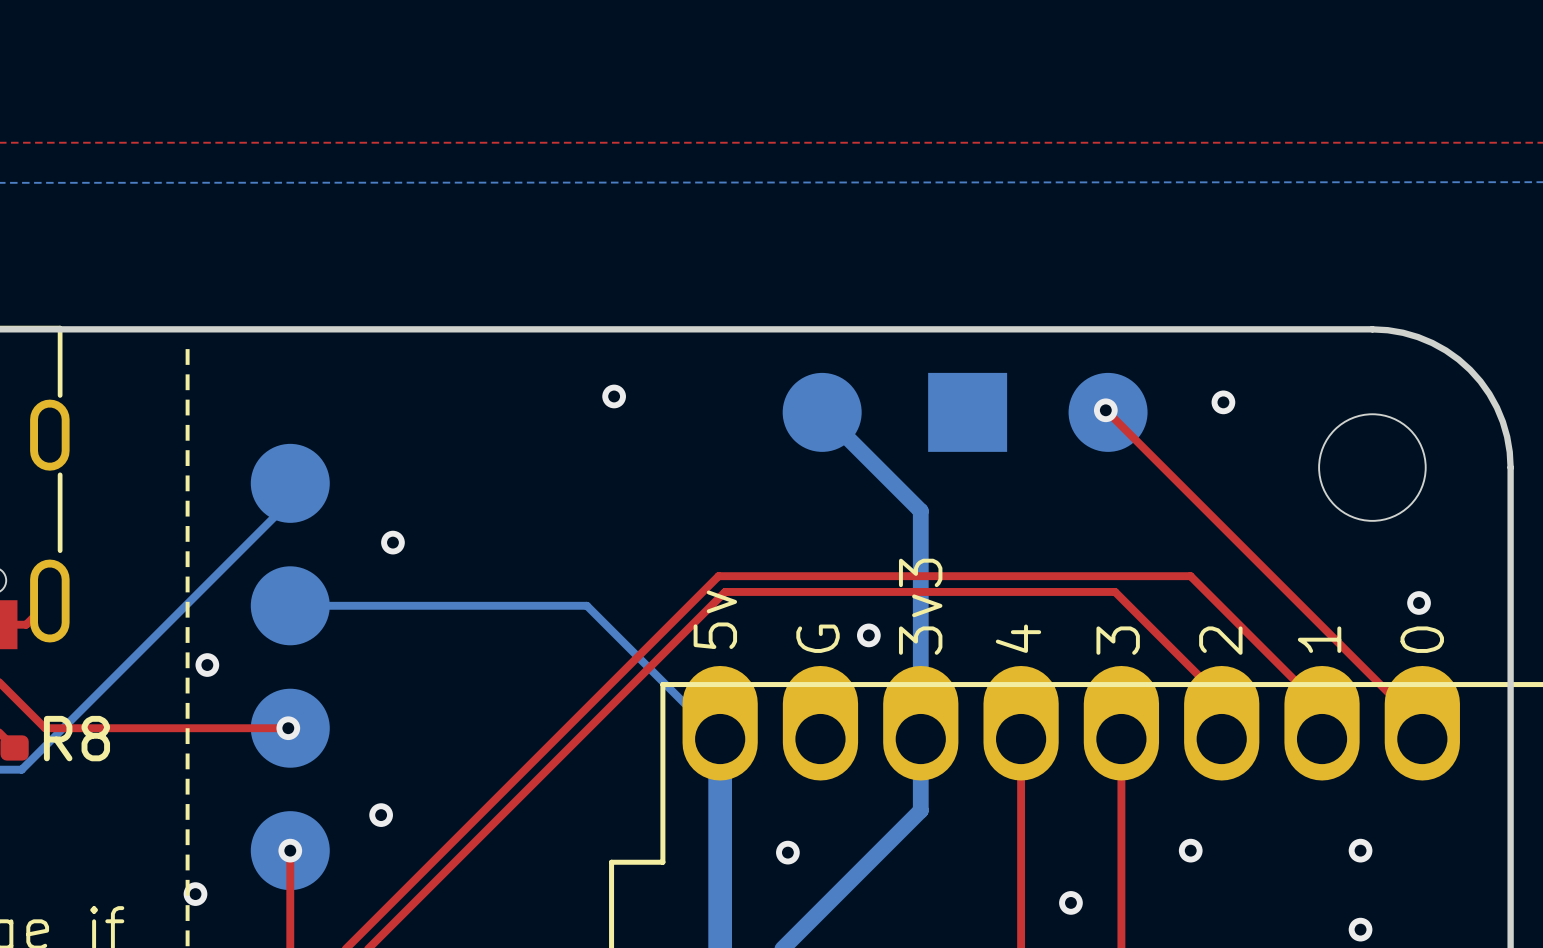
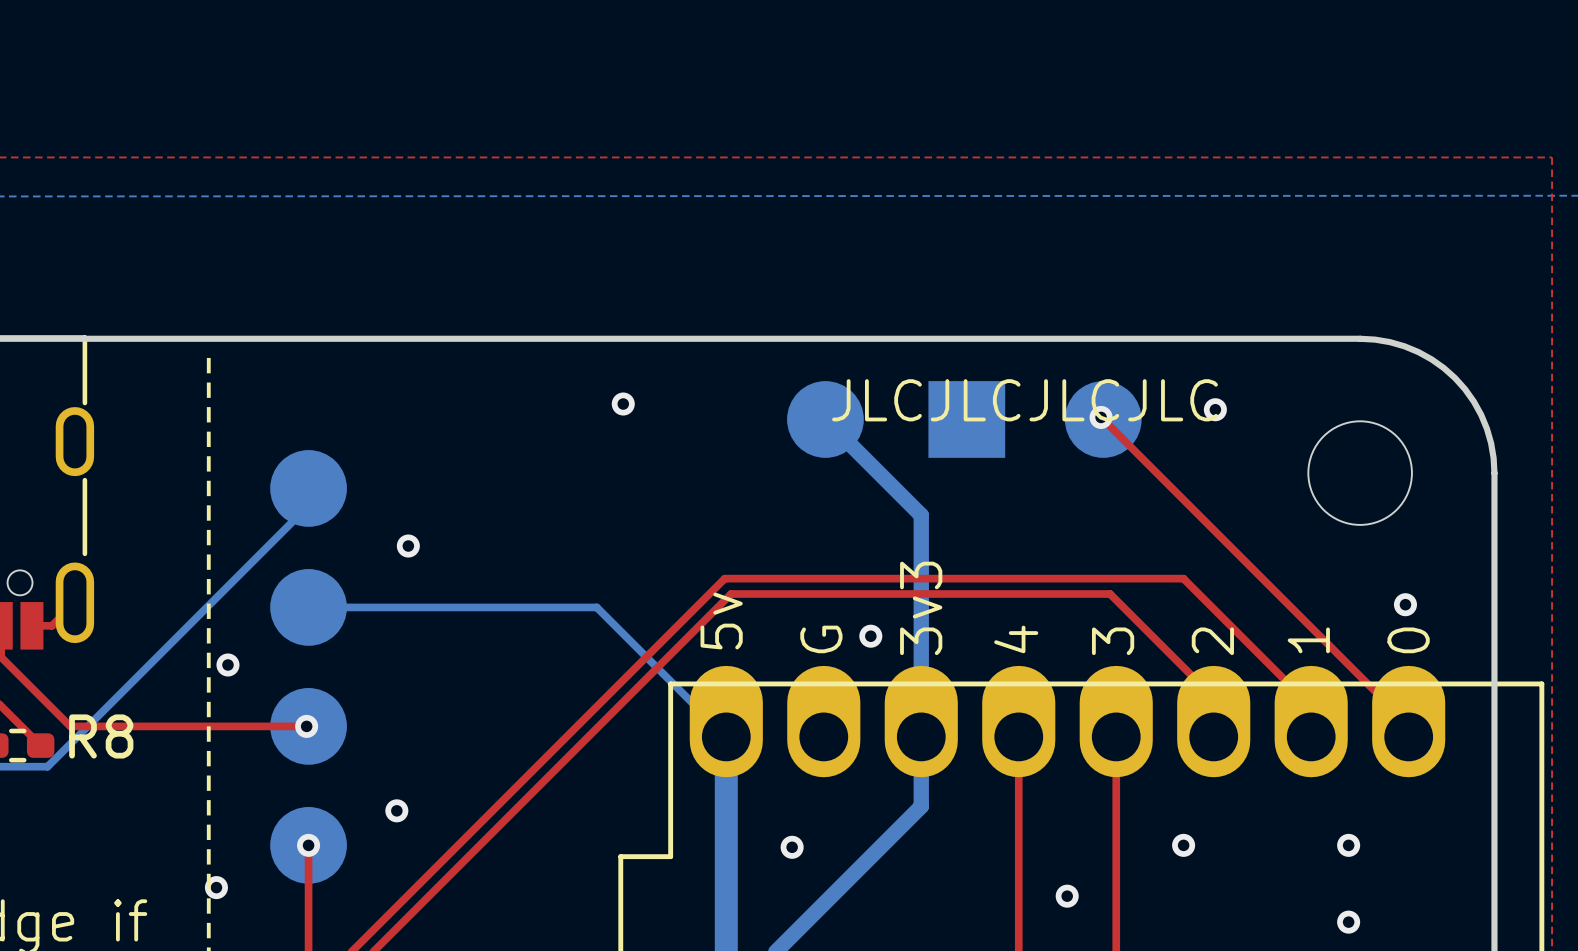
text: none -> JLCJLCJLCJLC (1025, 400)

